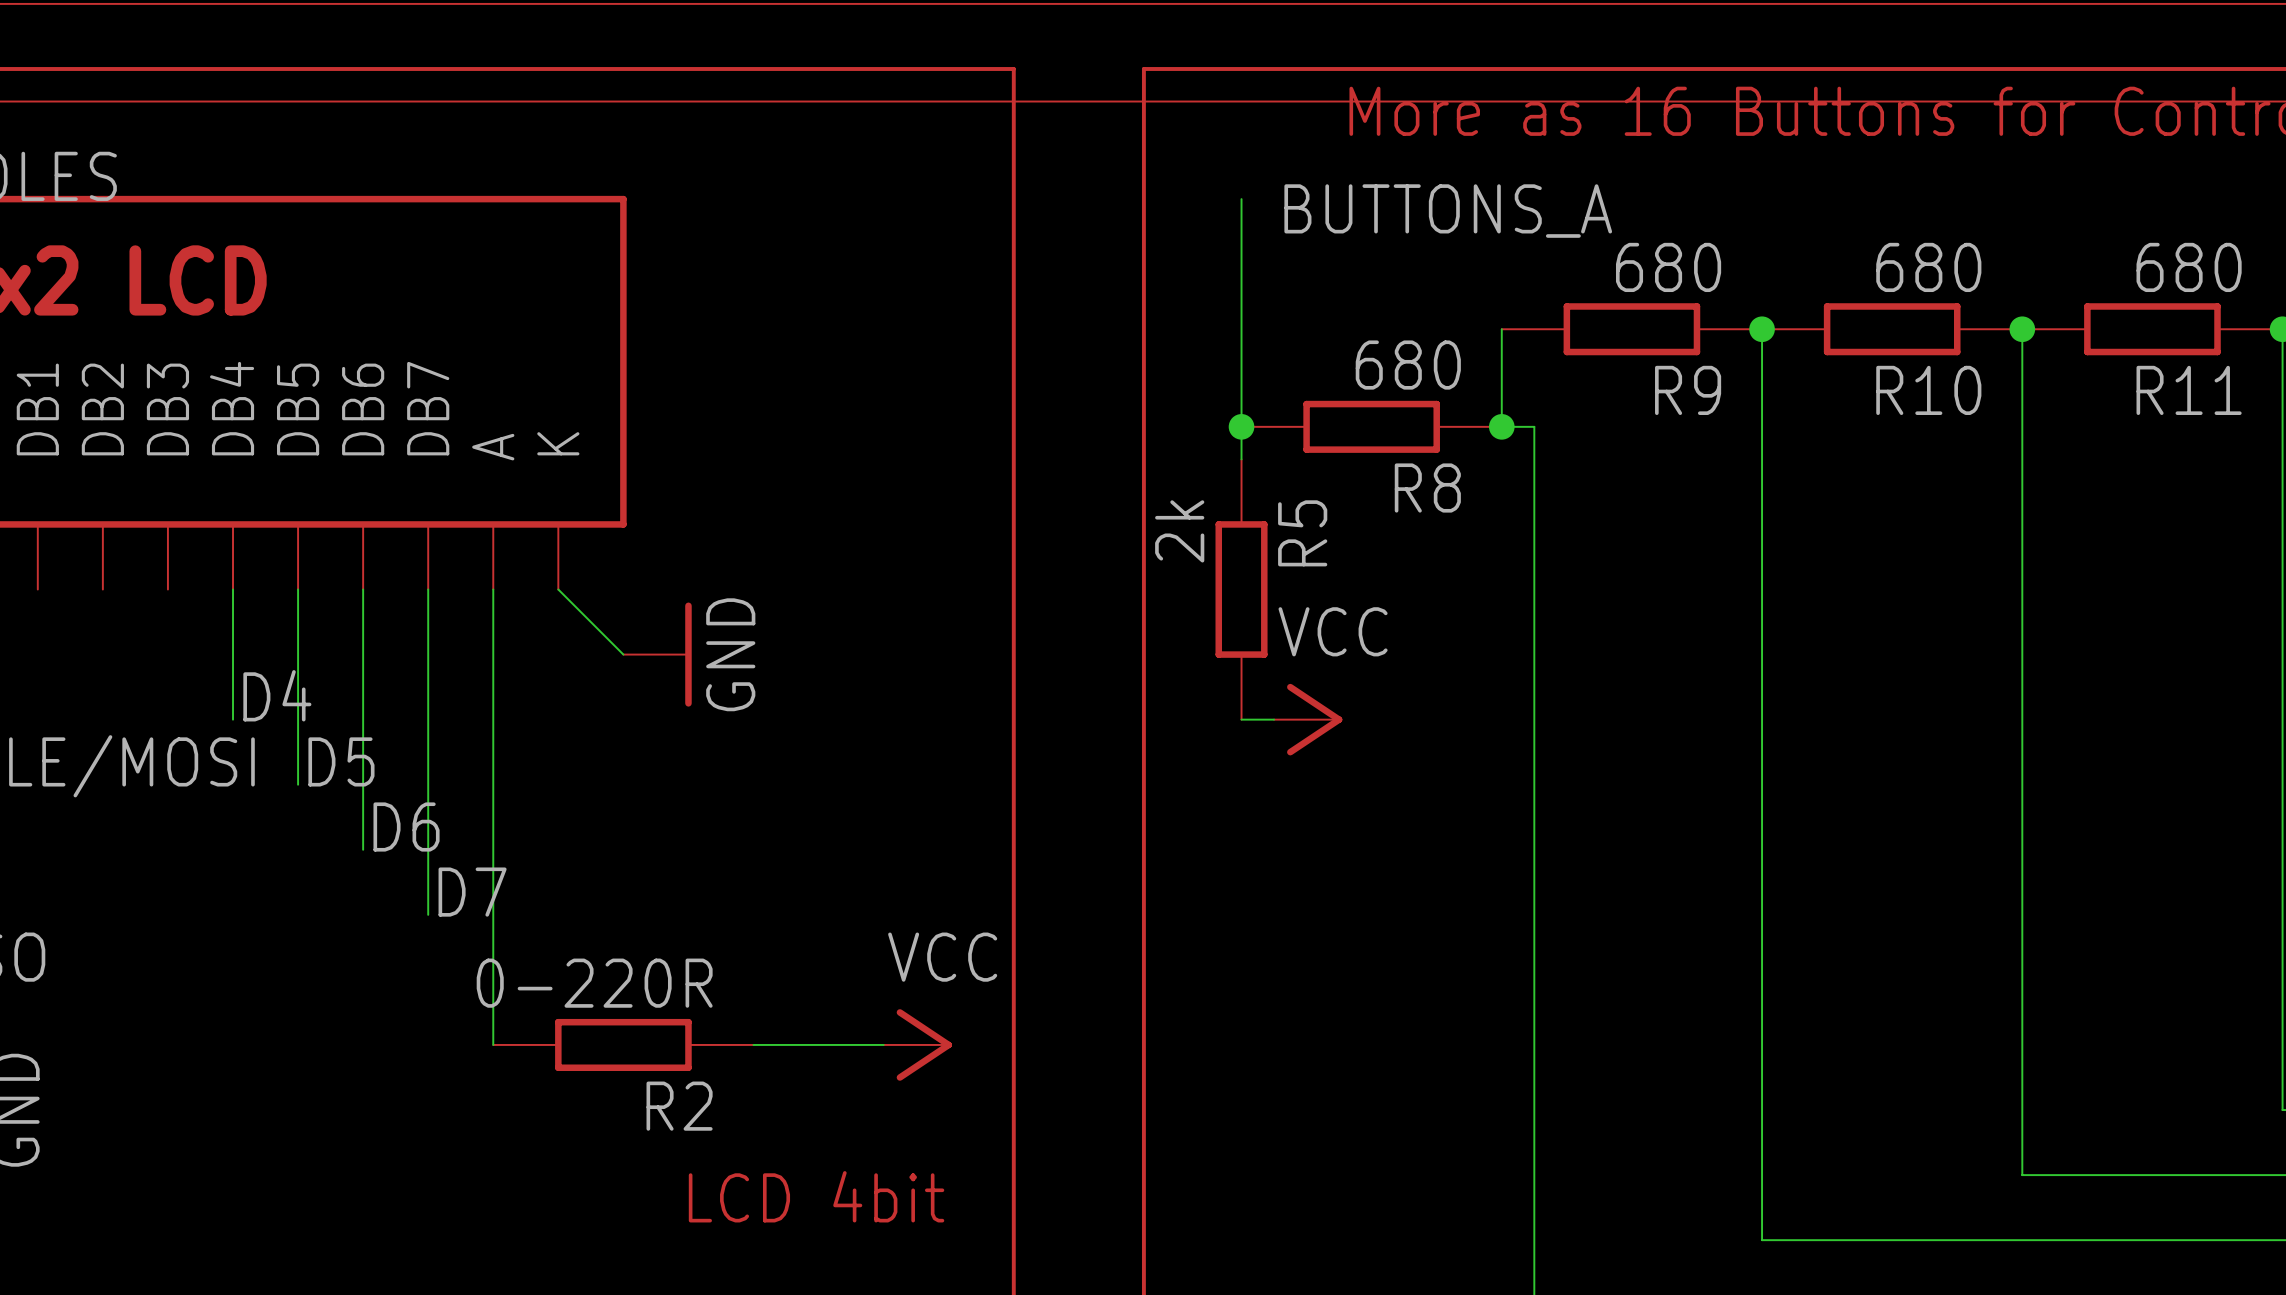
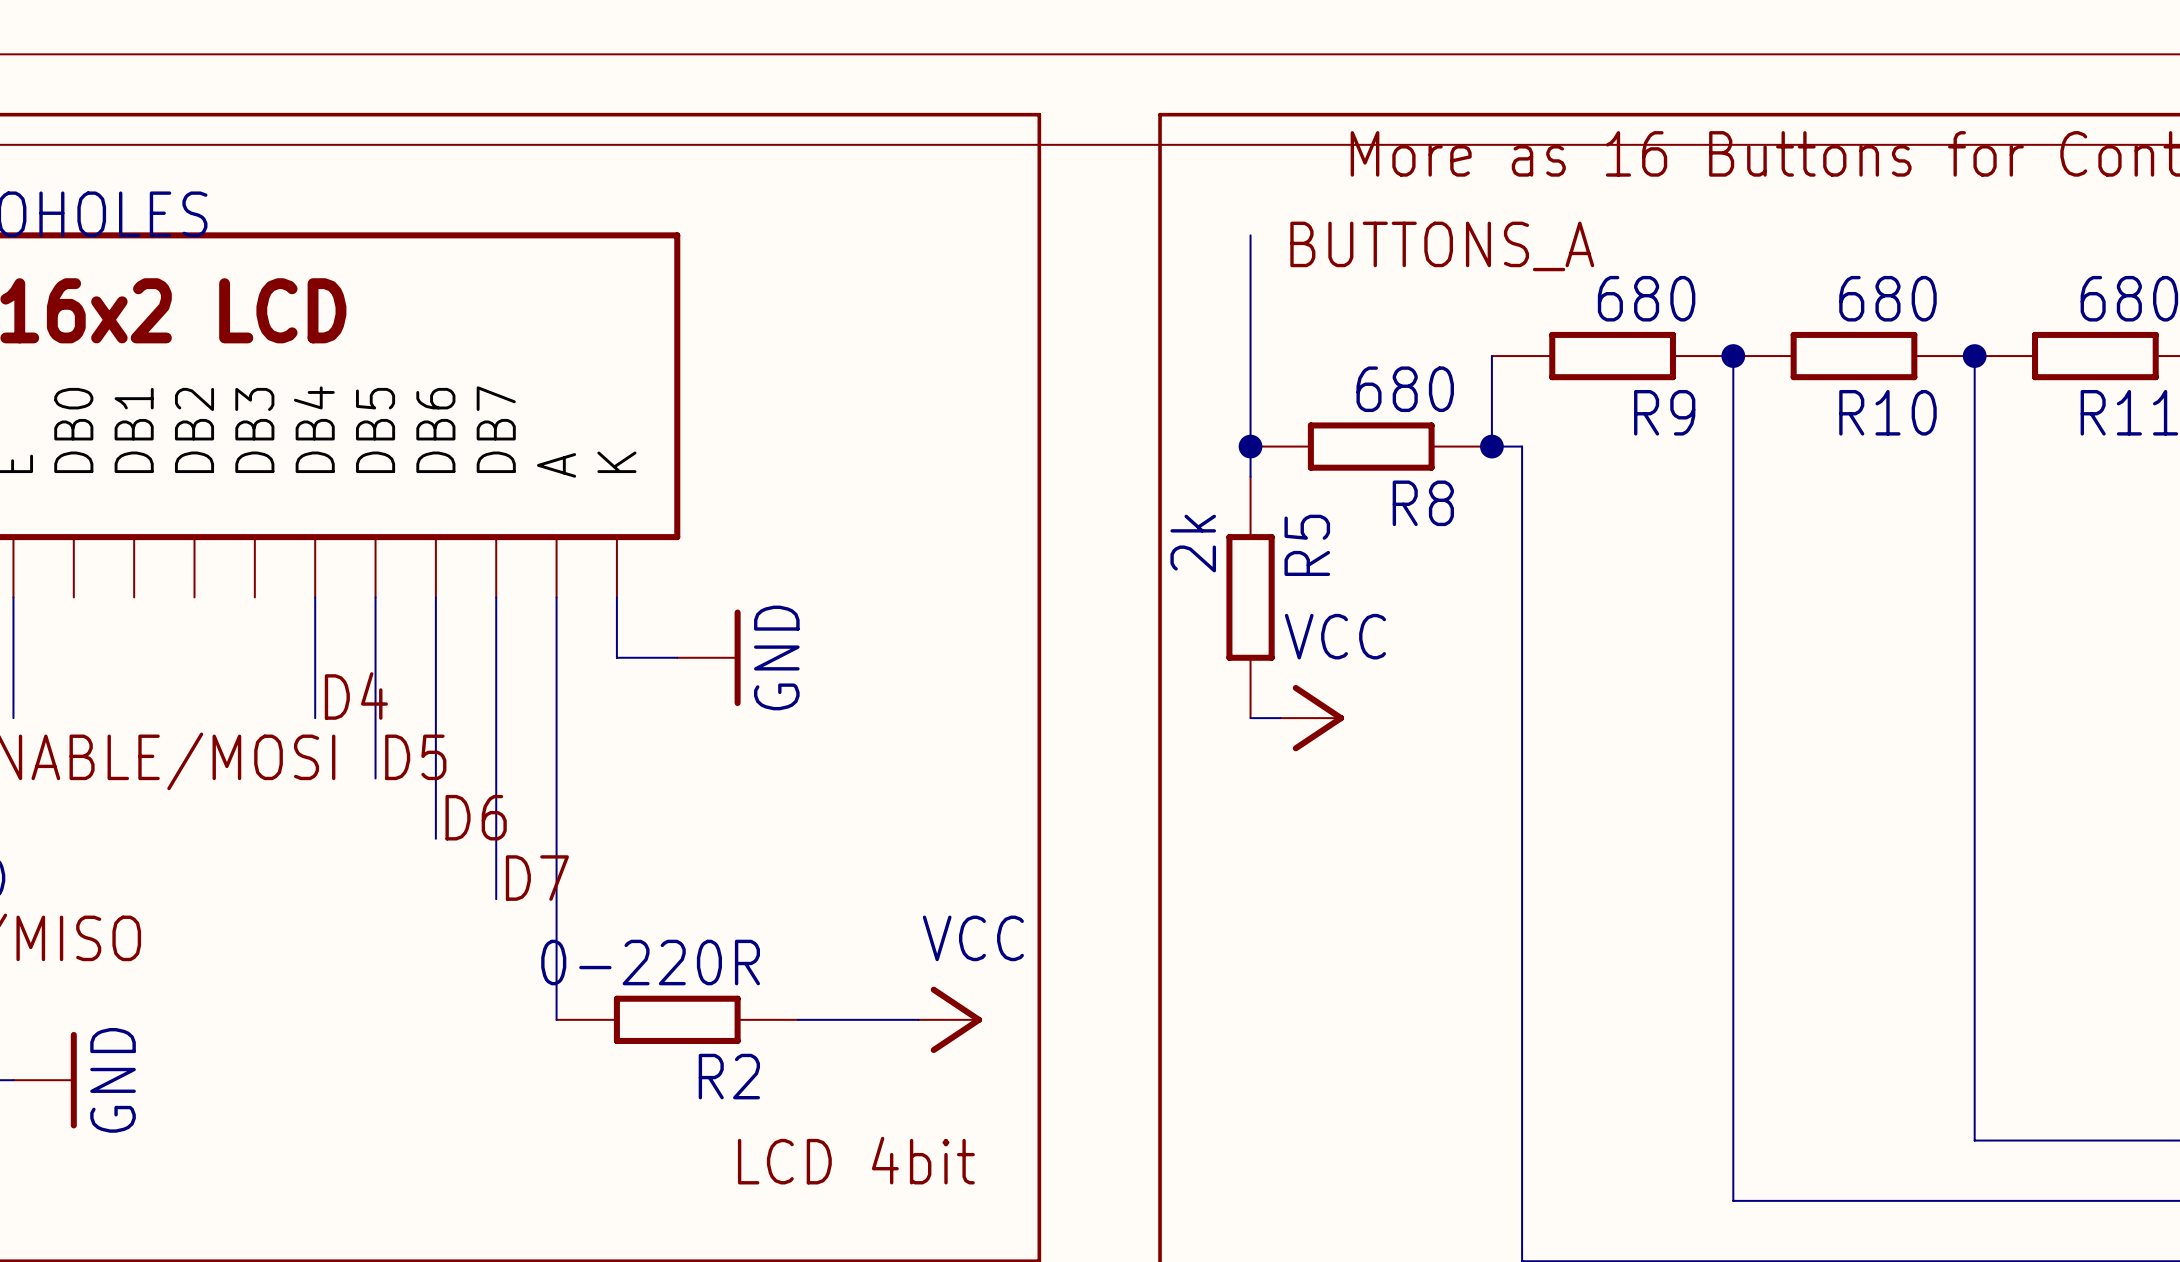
wire: (558, 589) (623, 654) -> (616, 597) (616, 657) (677, 657)

